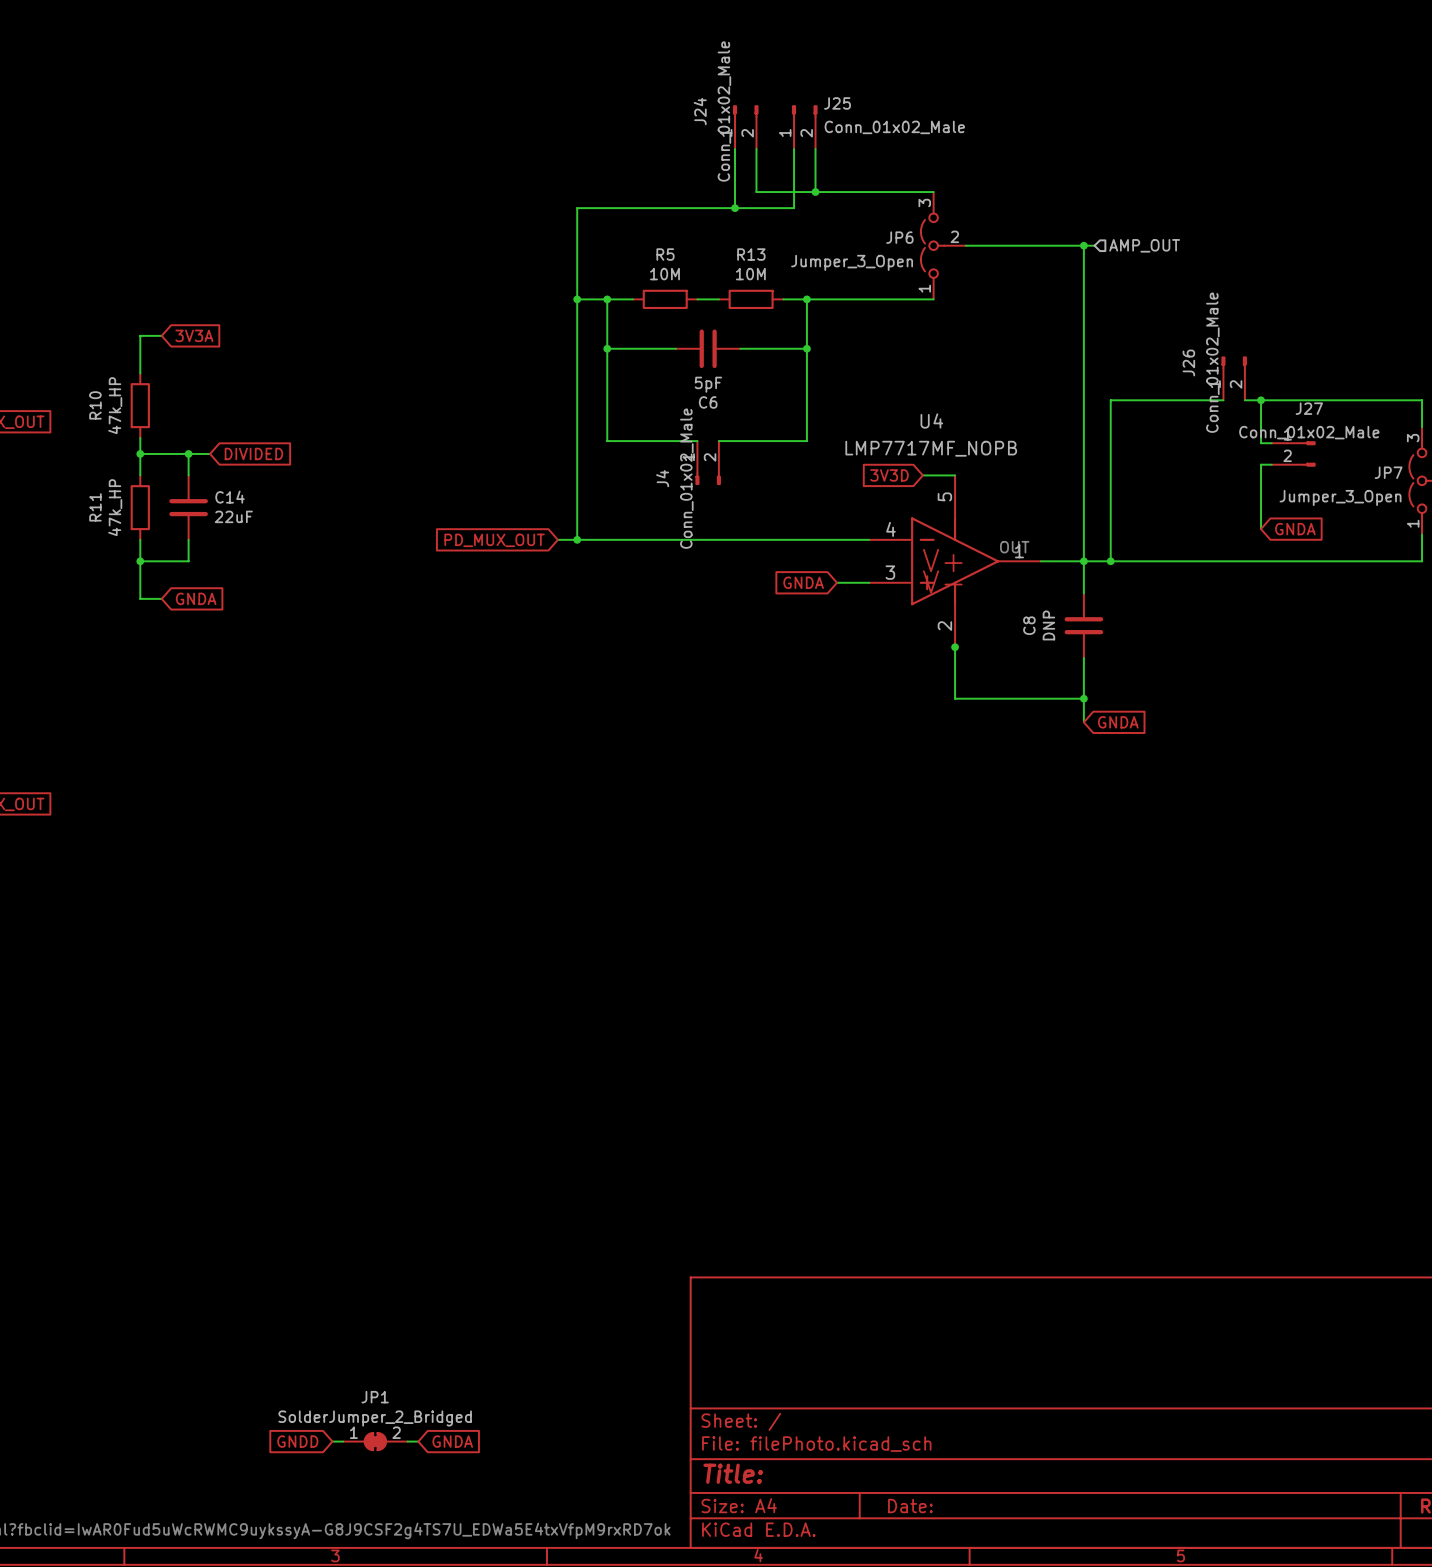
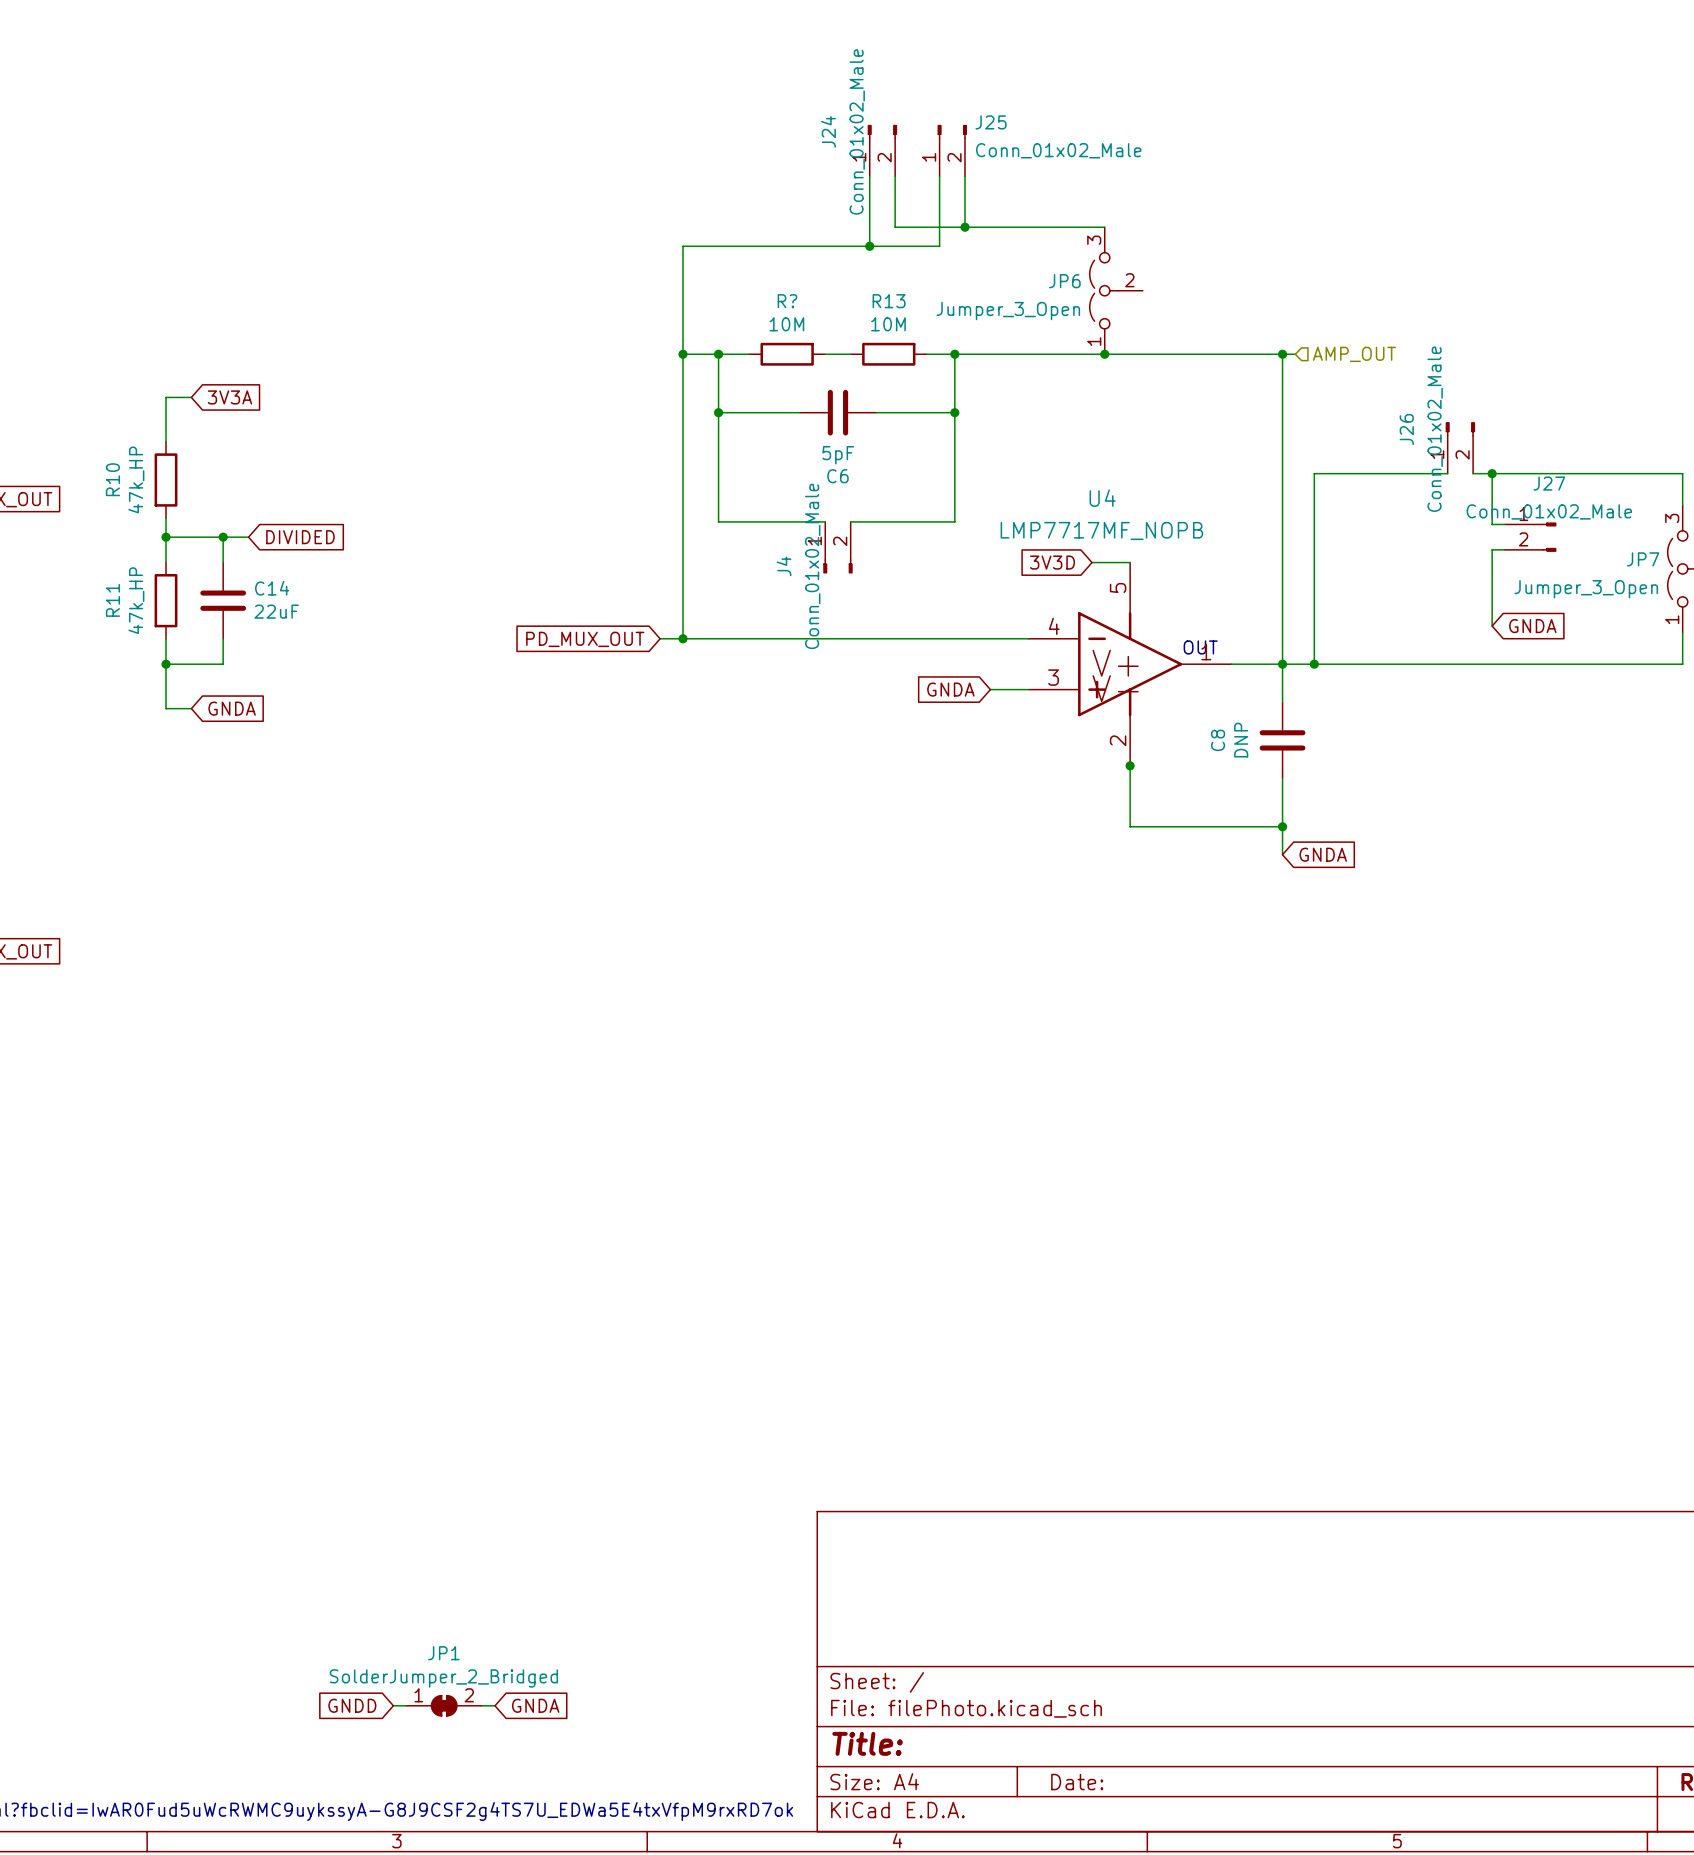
wire: (965, 245) (1094, 245) -> none
wire: (1083, 245) (1083, 299) -> none
junction: (1083, 245) -> none
hierarchical label position: AMP_OUT (1144, 245) -> AMP_OUT (1354, 354)
R5 name: R5 (665, 254) -> R? (787, 301)
wire: none -> (1104, 354) (1295, 354)
junction: none -> (1104, 354)
junction: none -> (1282, 354)

